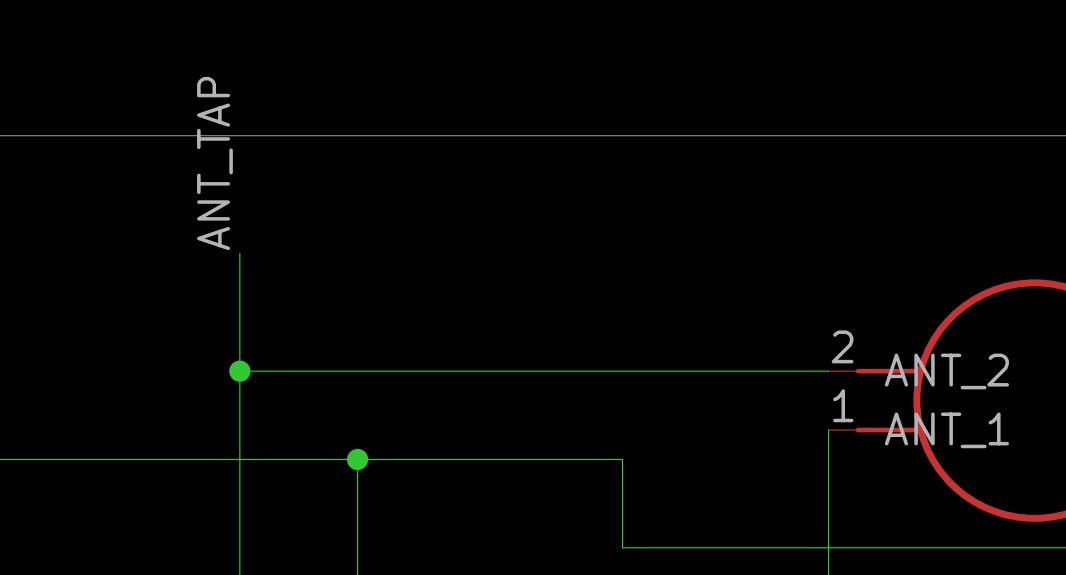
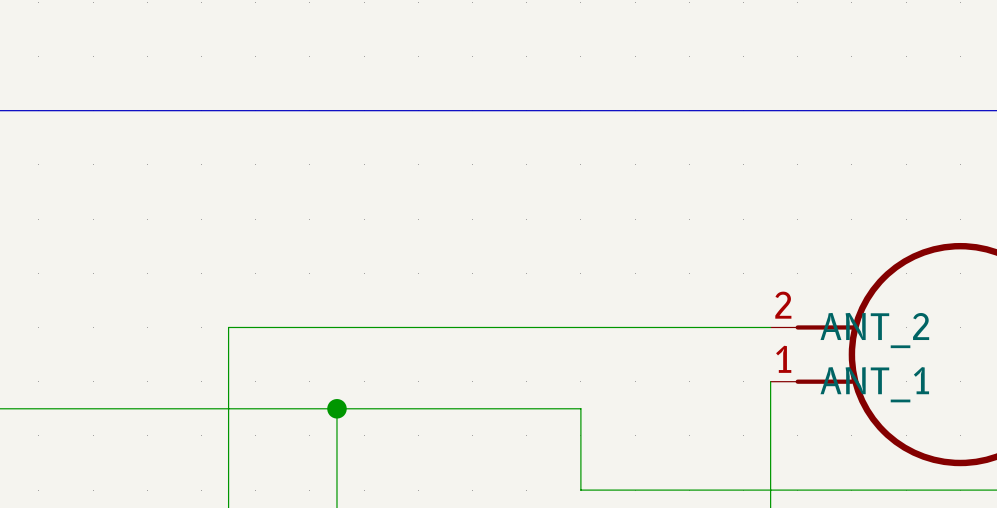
label: ANT_TAP (214, 163) -> none
wire: (239, 253) (239, 371) -> none
junction: (239, 371) -> none

